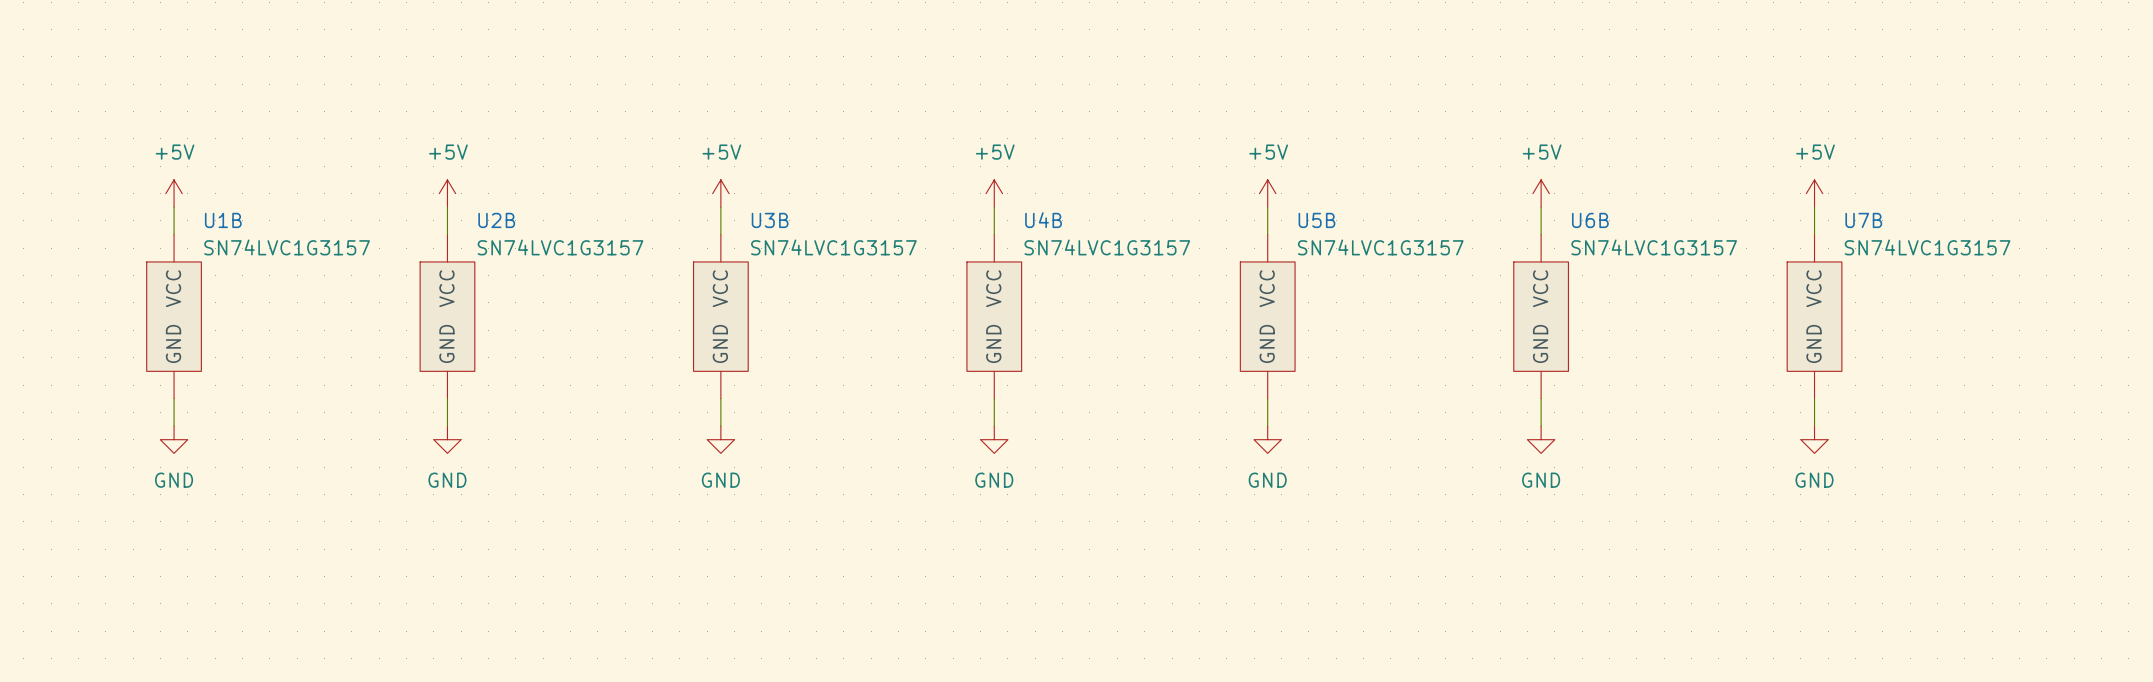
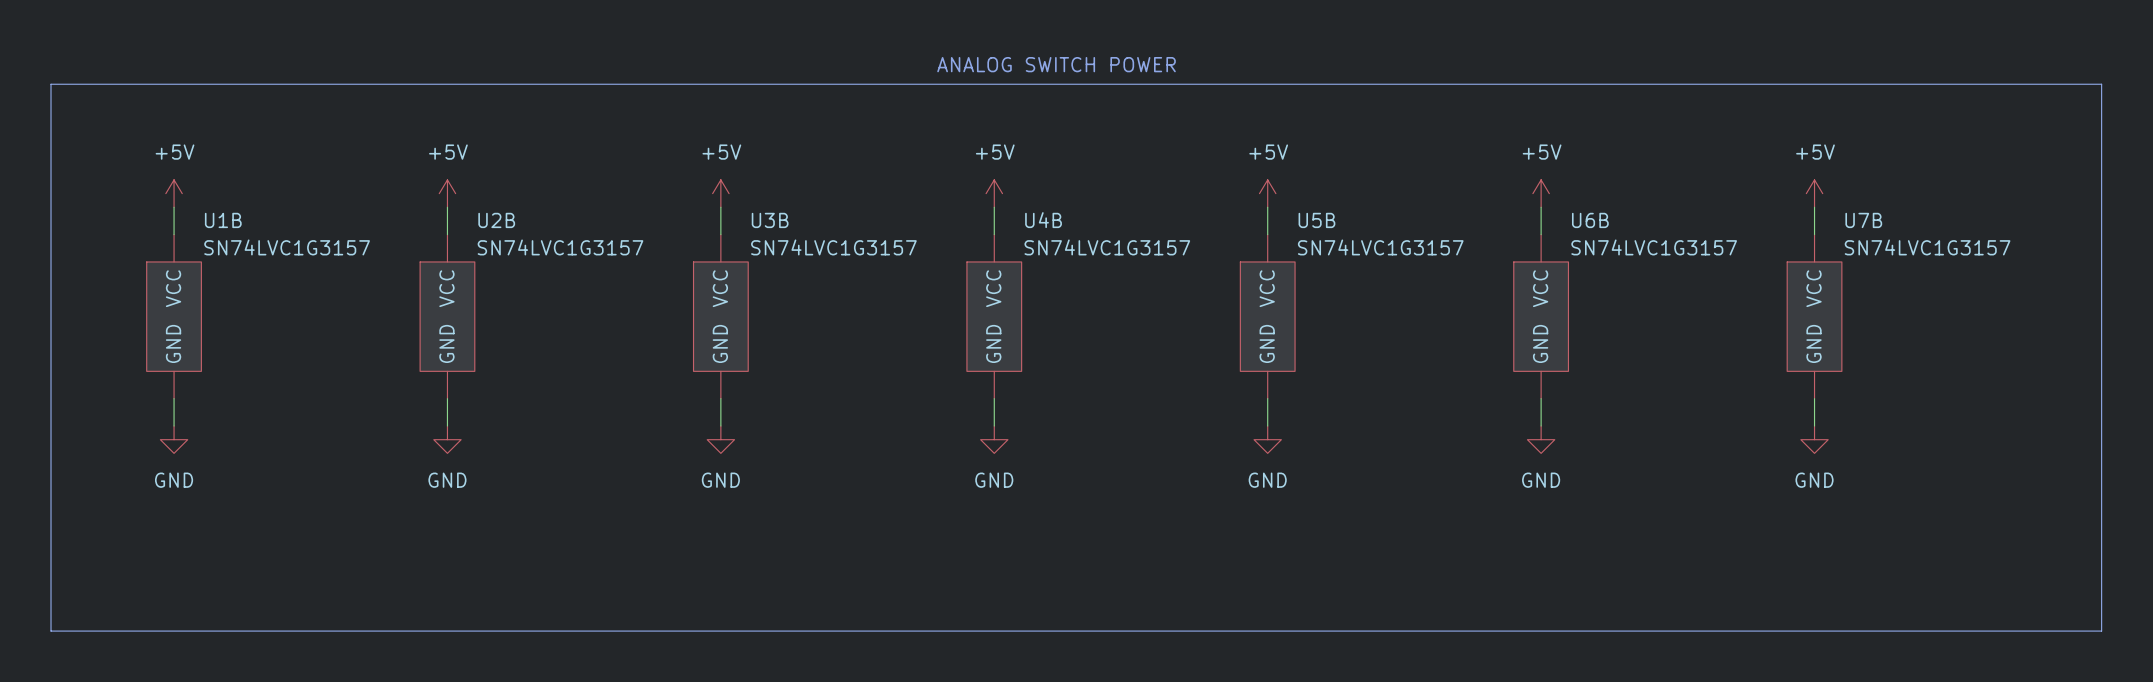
text: none -> ANALOG SWITCH POWER (1056, 64)
line: none -> (51, 84) (2101, 84) (2101, 631) (51, 631) (51, 84)

